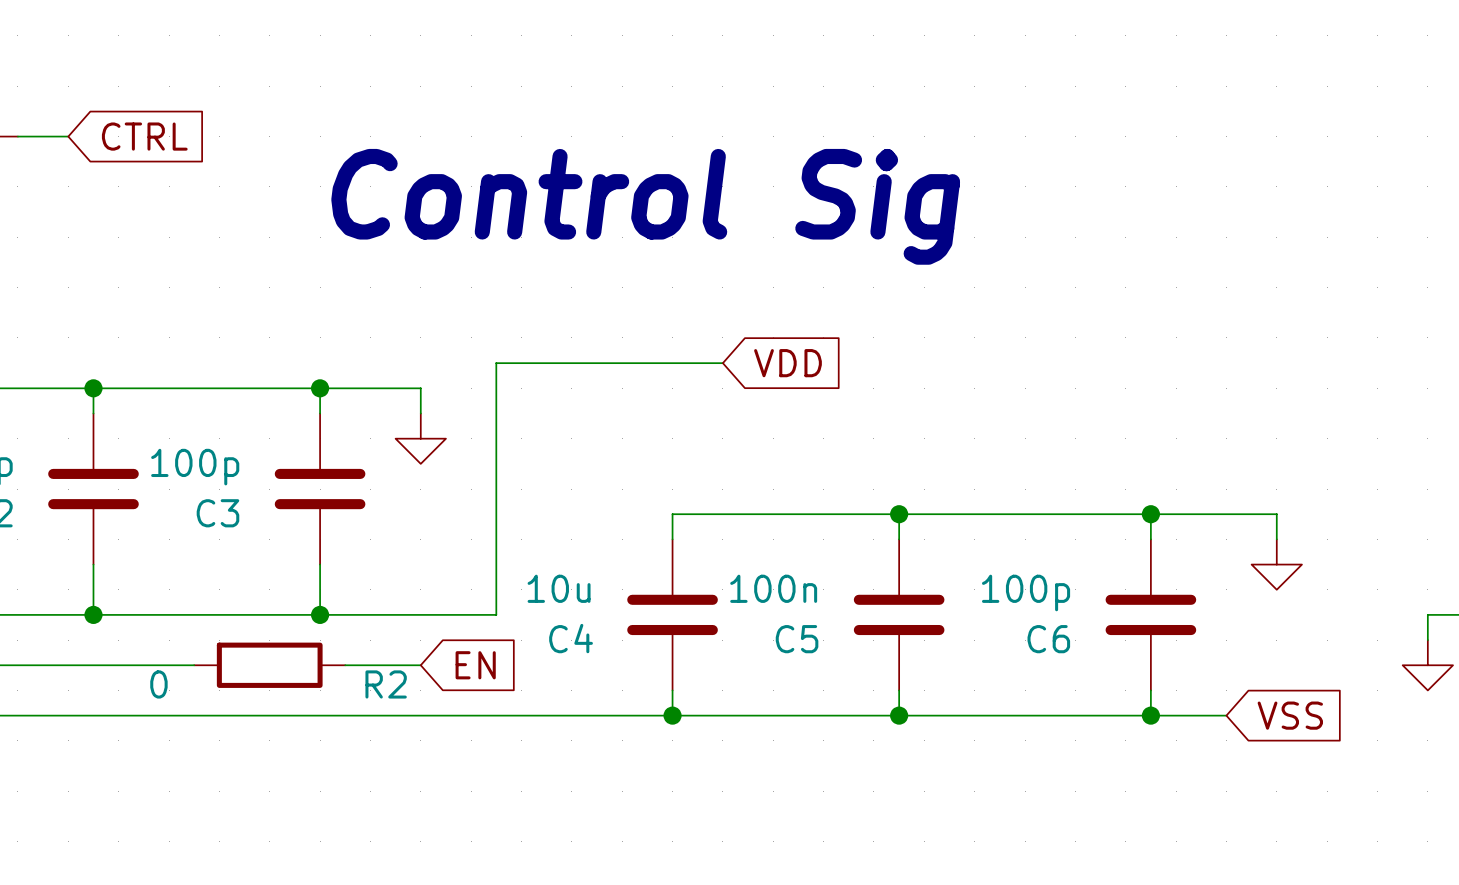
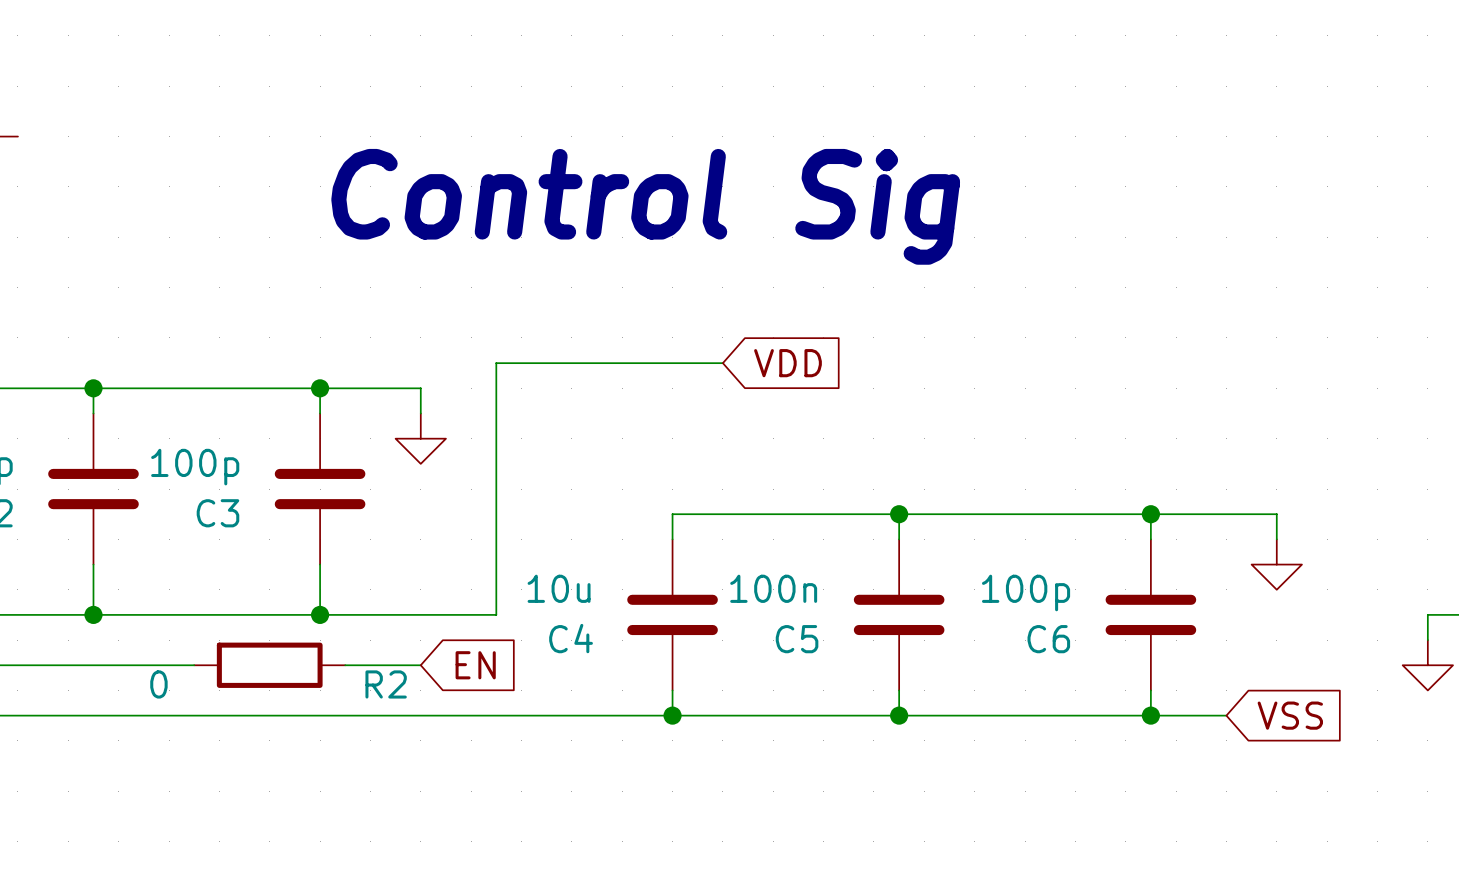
wire: (17, 136) (68, 136) -> none
global label: CTRL (144, 136) -> none

